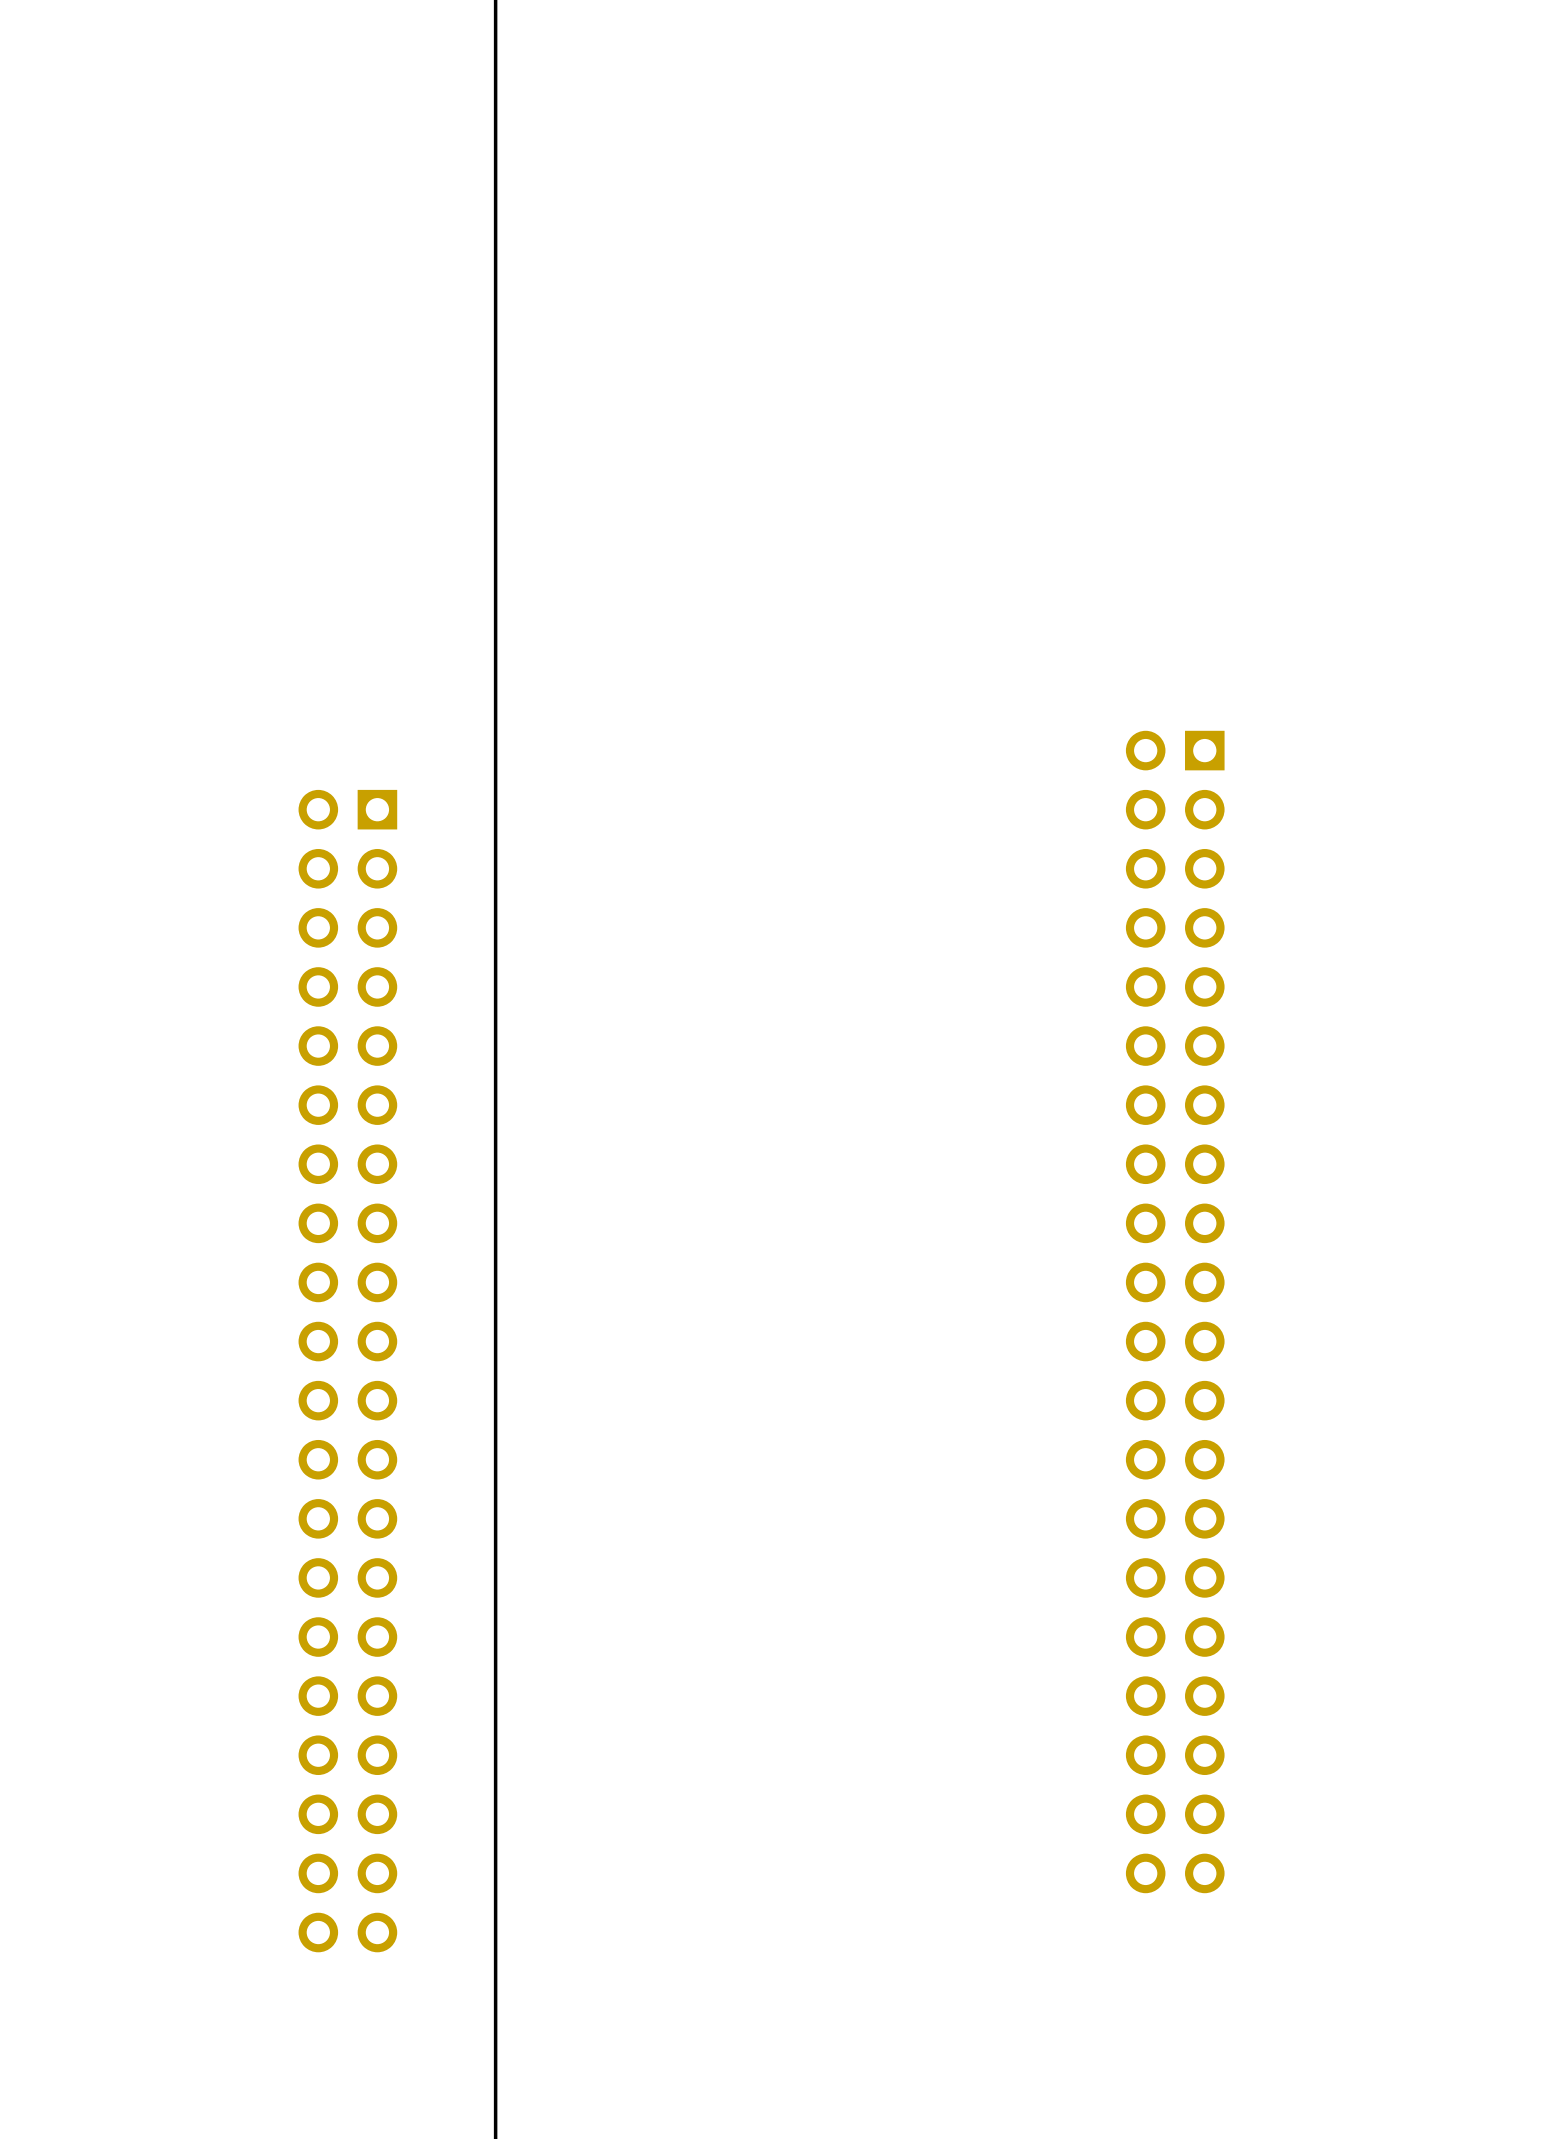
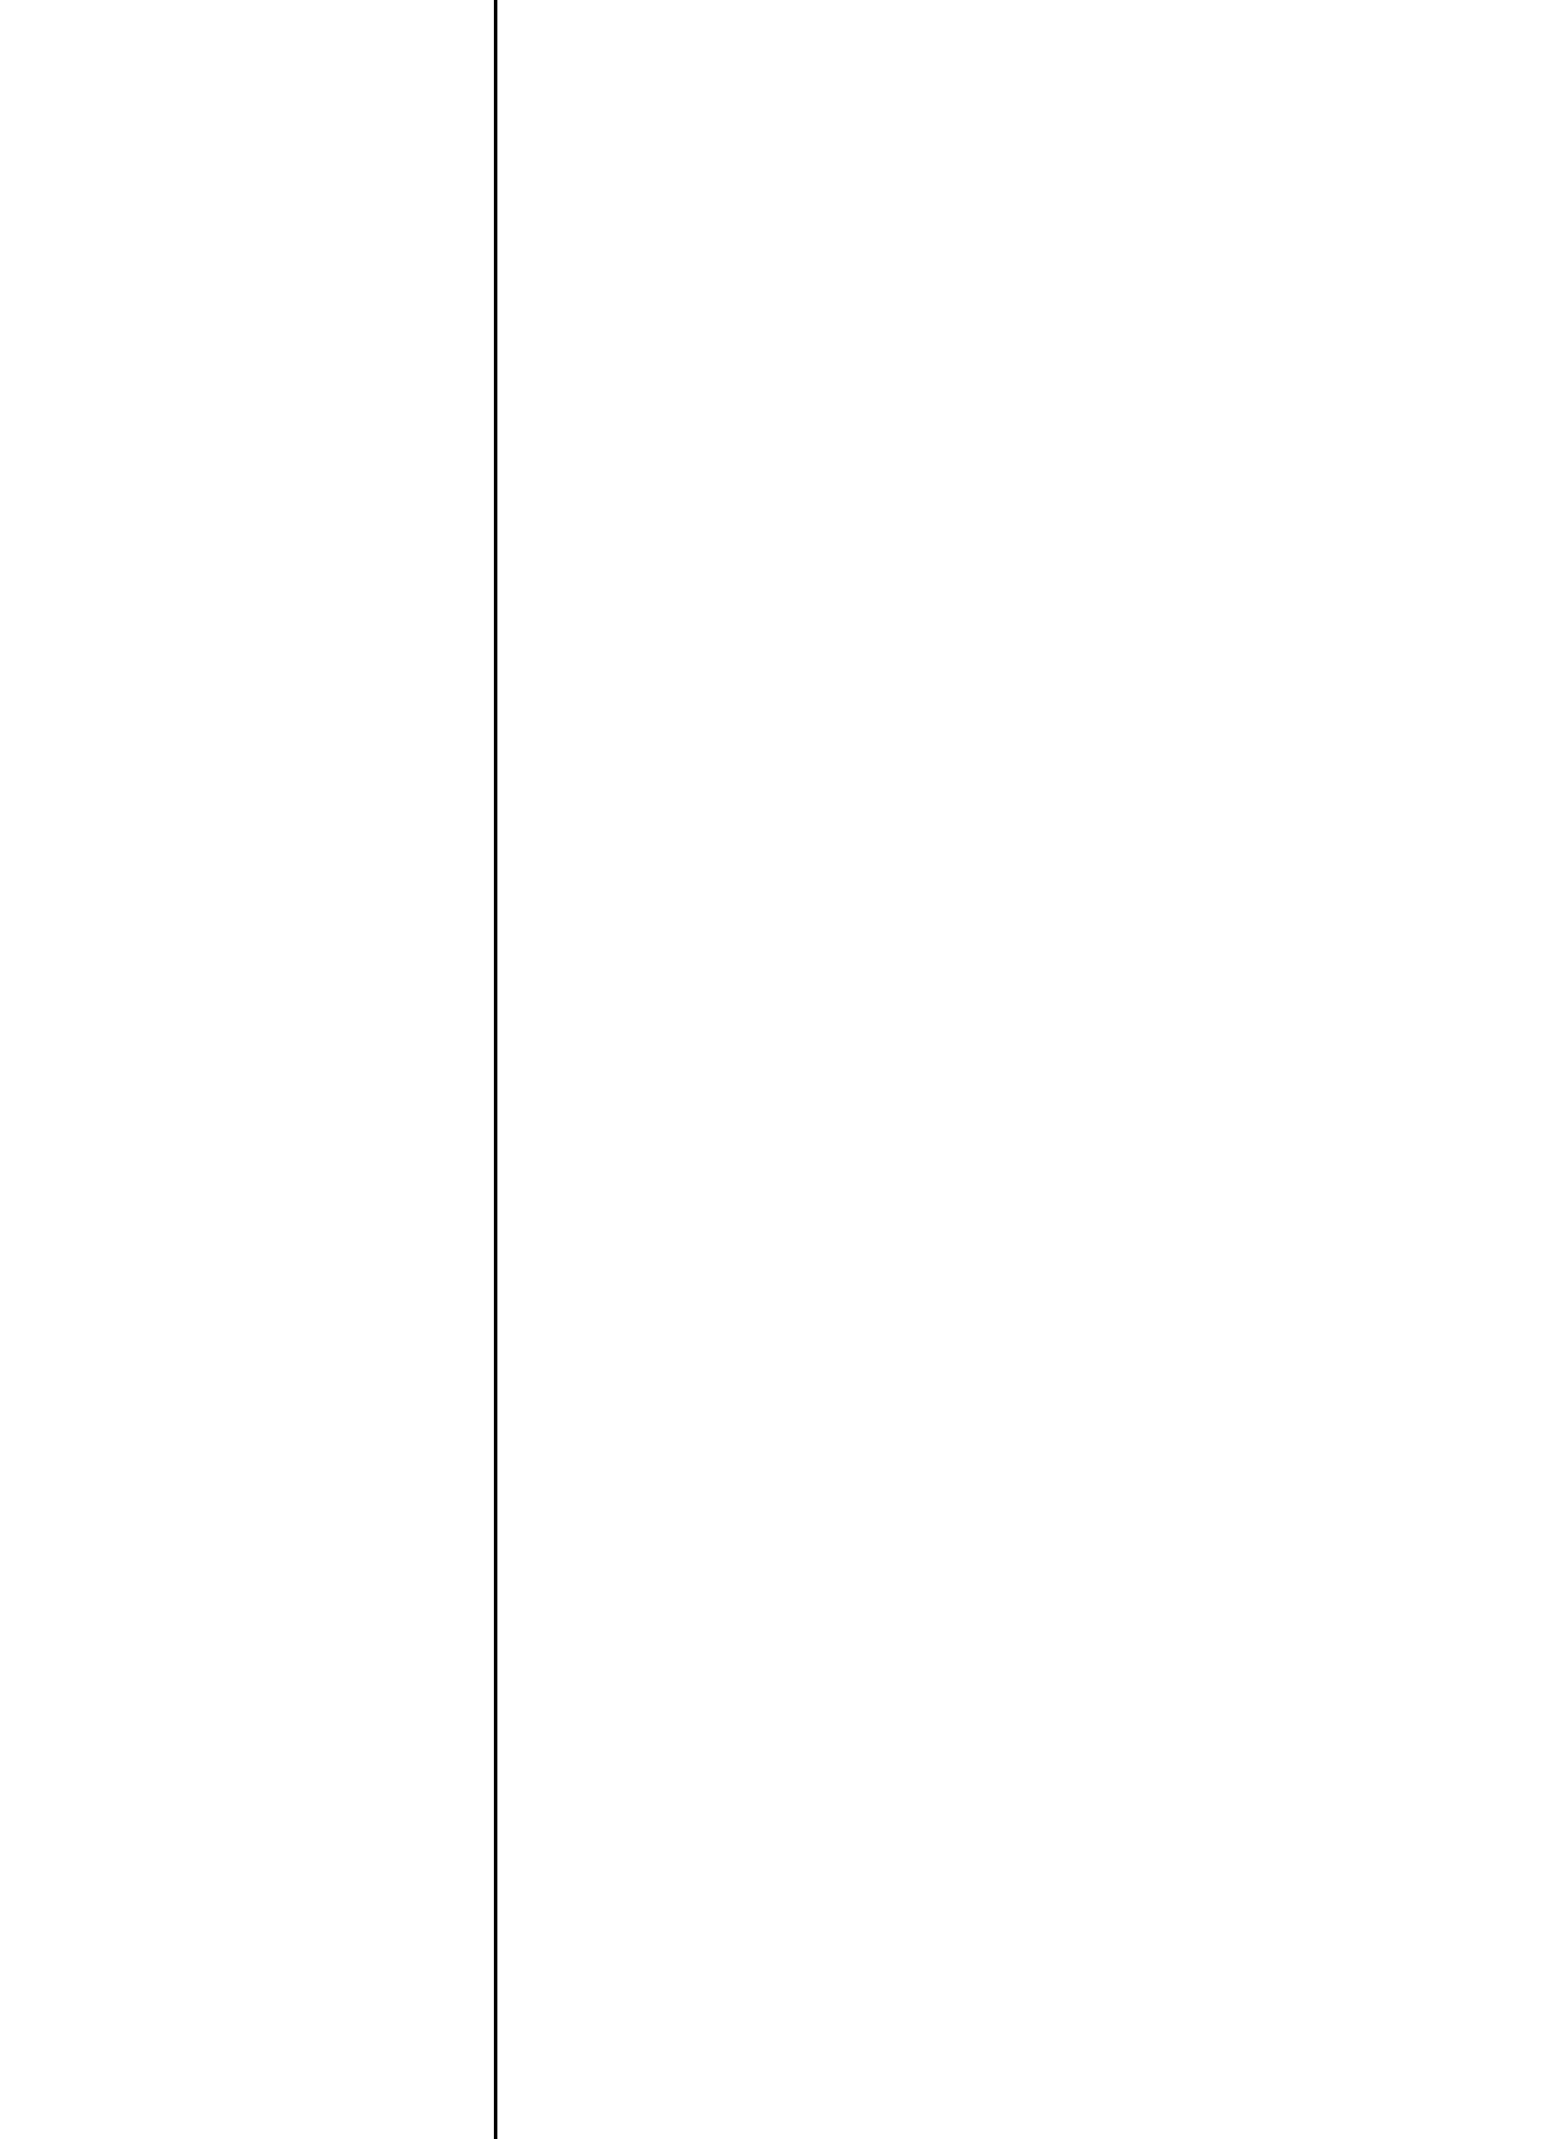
part: (1175, 1312) -> none
part: (347, 1371) -> none

